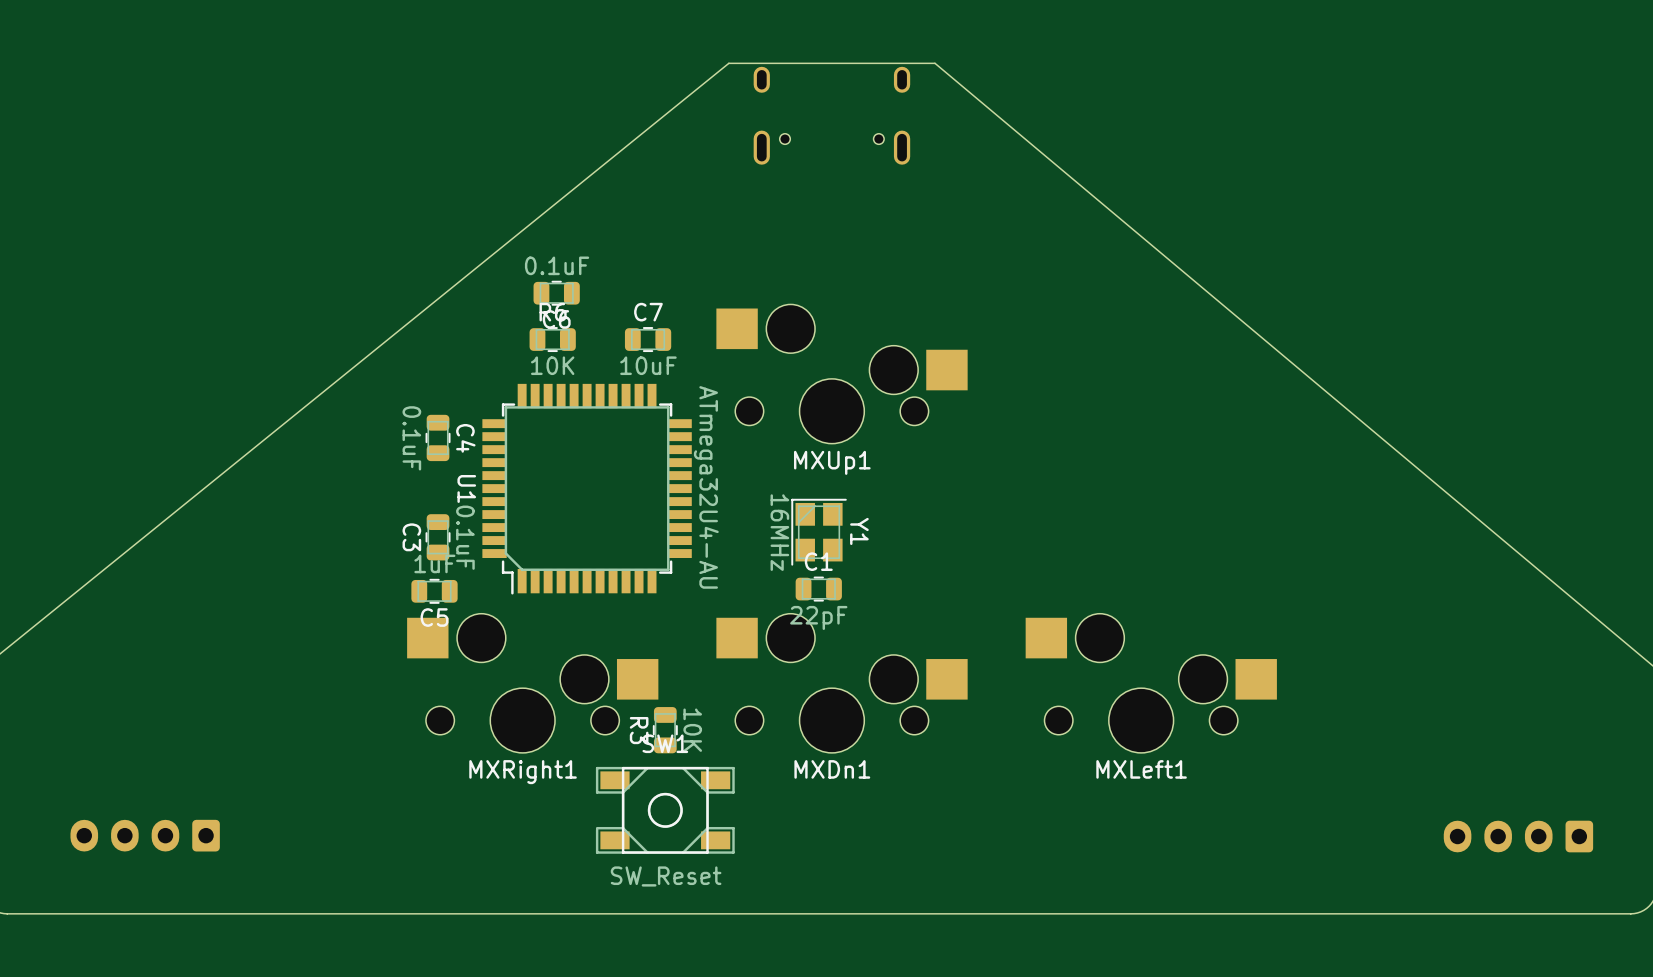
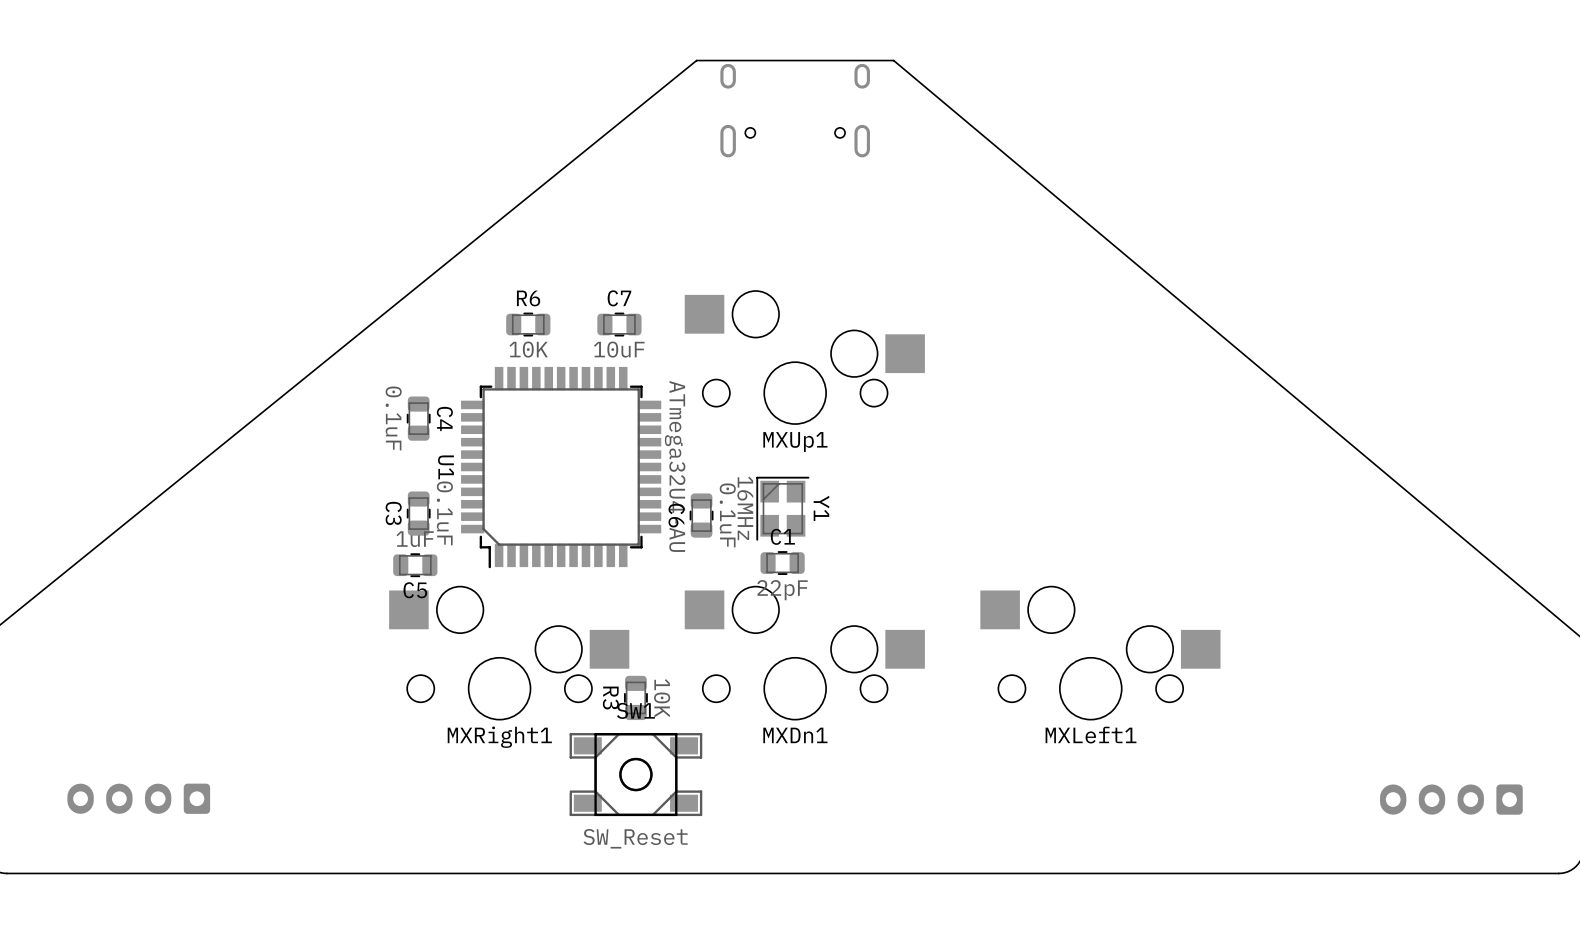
C6 rotation: 0° (556, 293) -> 90° clockwise (701, 515)
C6 position: (556, 293) -> (701, 515)

